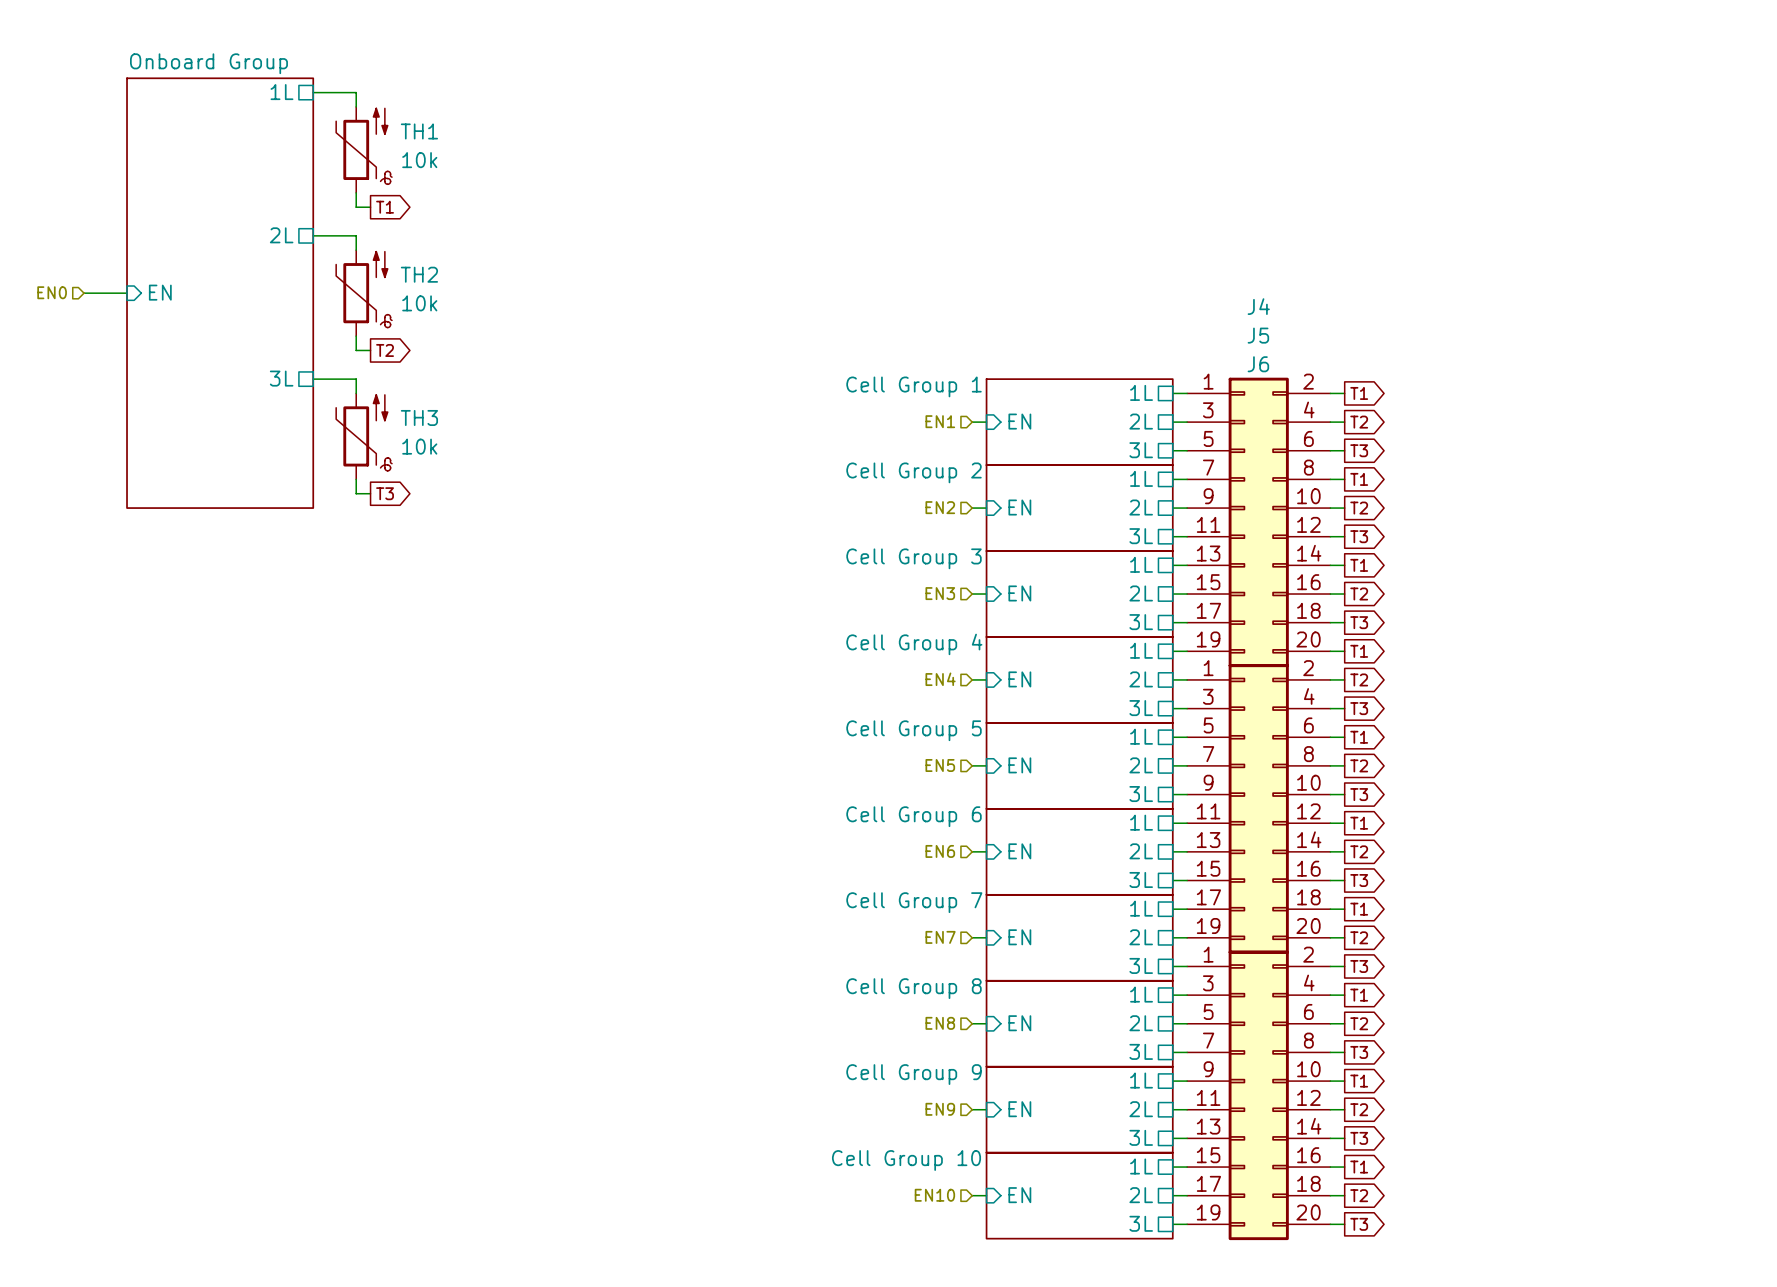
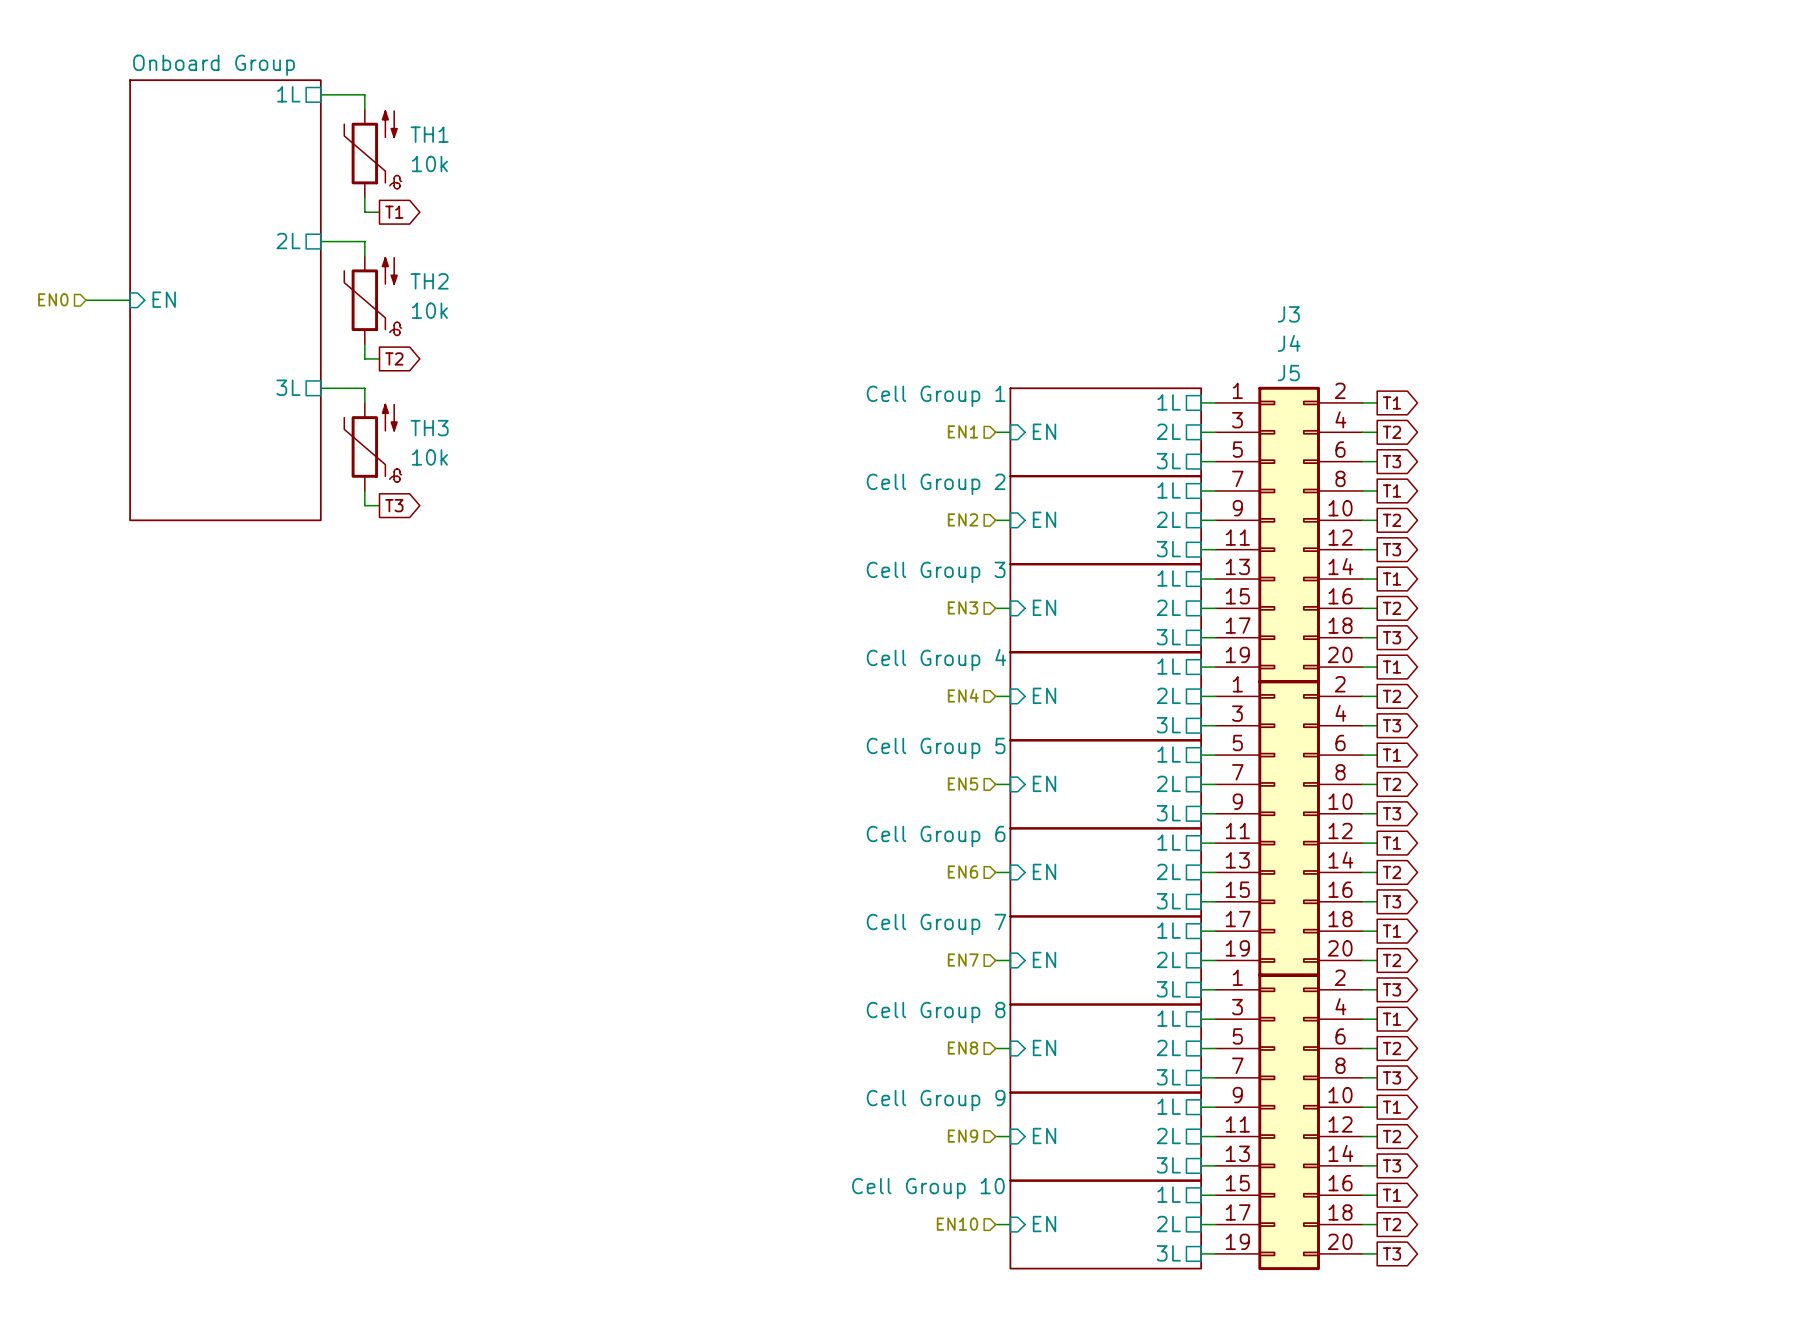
J4 name: J4 (1258, 306) -> J3 (1288, 314)
J5 name: J5 (1258, 335) -> J4 (1289, 343)
J6 name: J6 (1258, 364) -> J5 (1288, 373)

